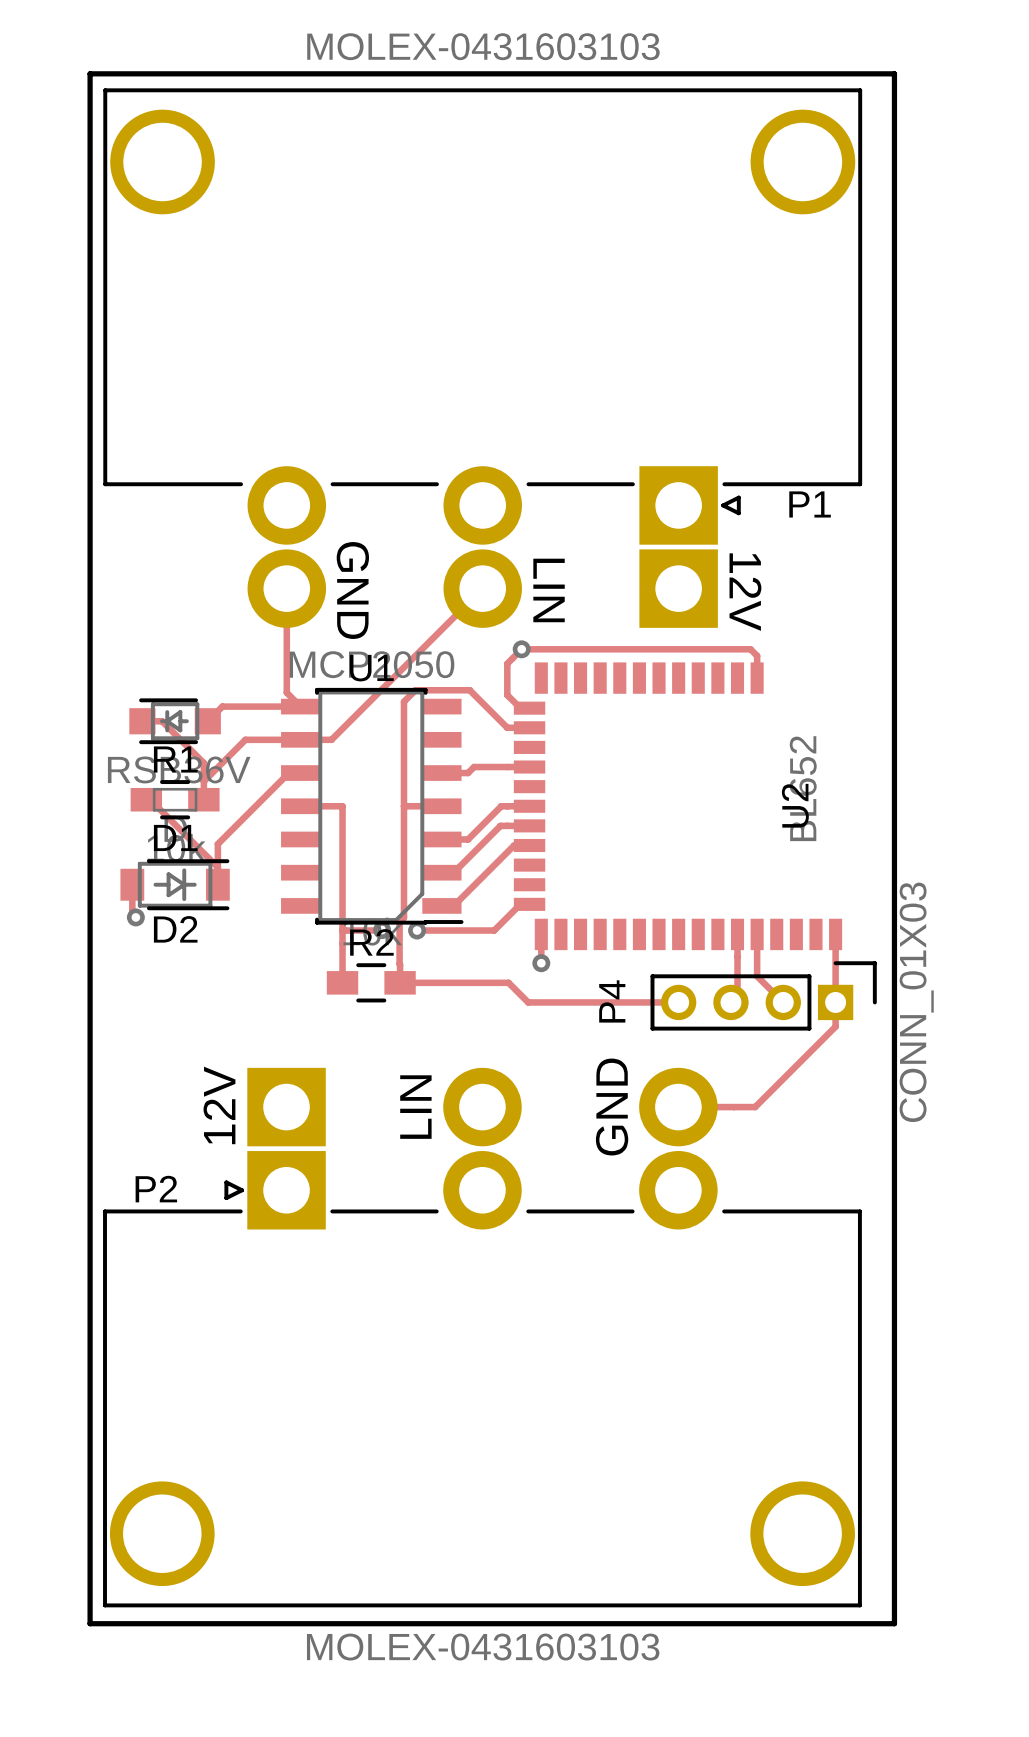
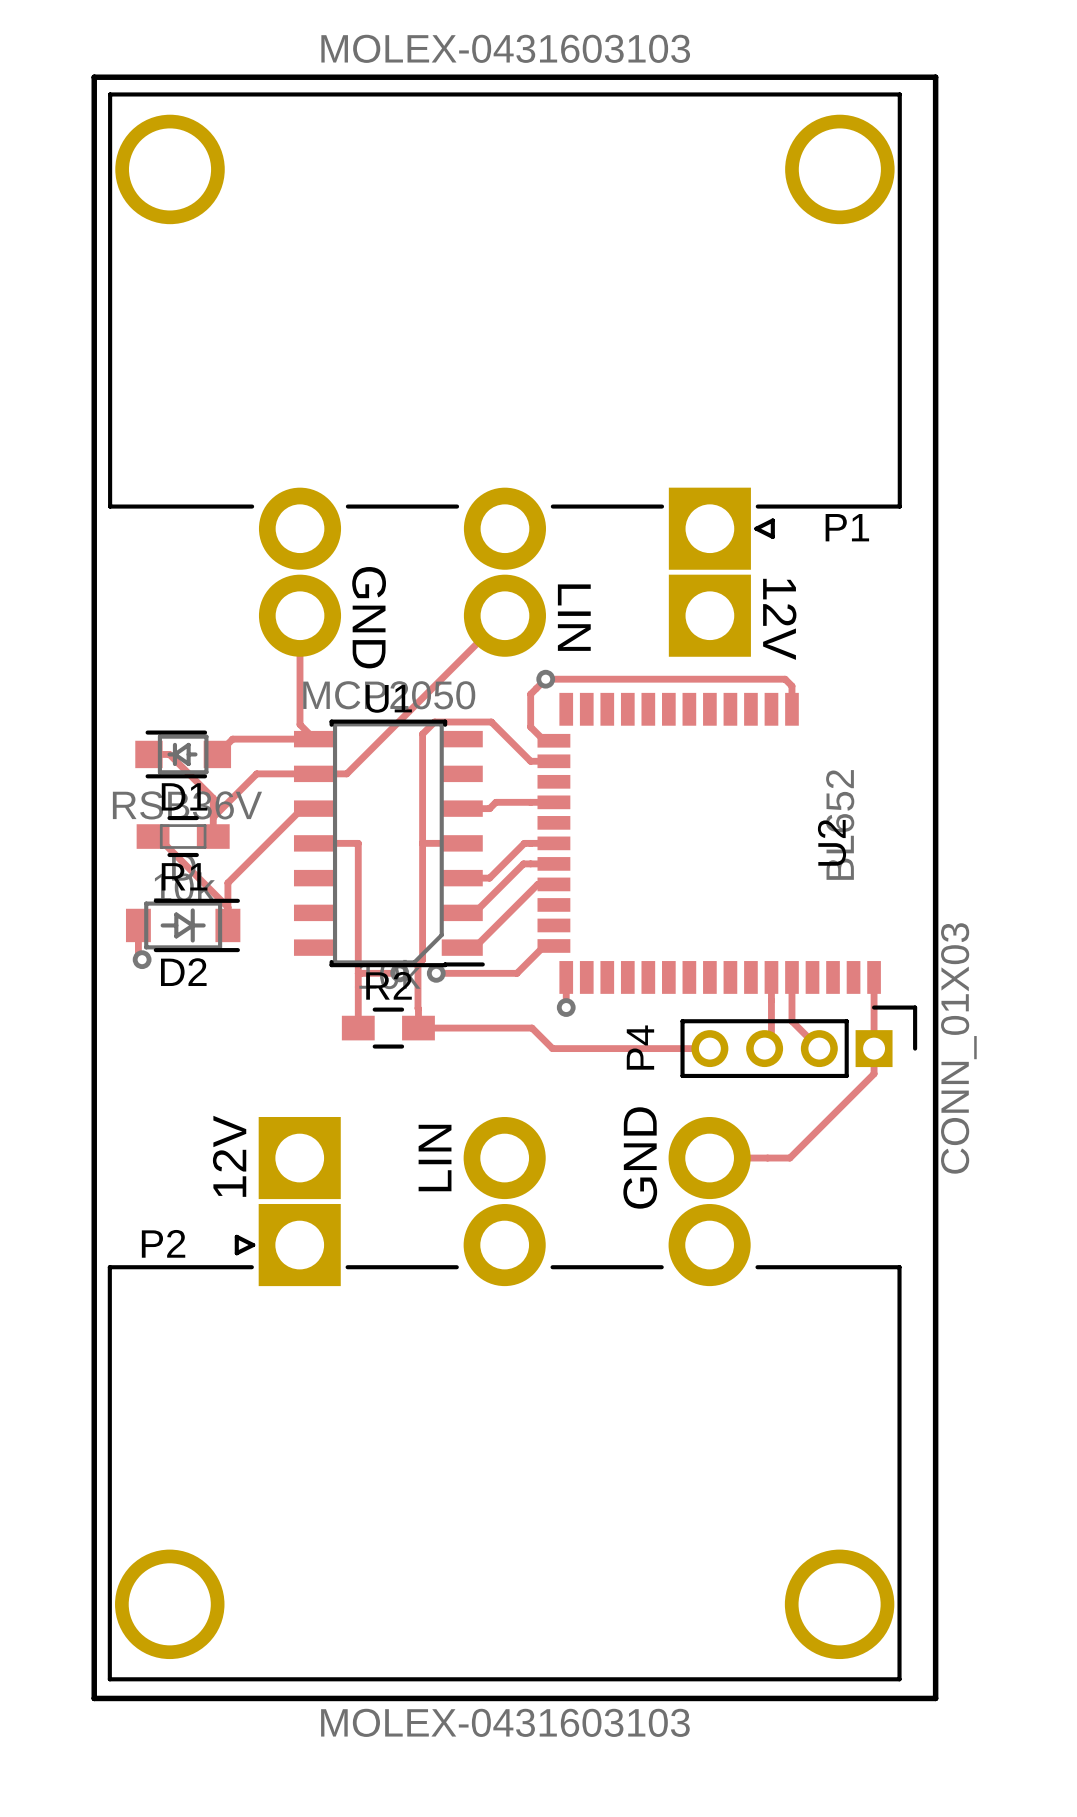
R1 name position: R1 (175, 759) -> R1 (184, 876)
D1 name position: D1 (175, 837) -> D1 (184, 796)

